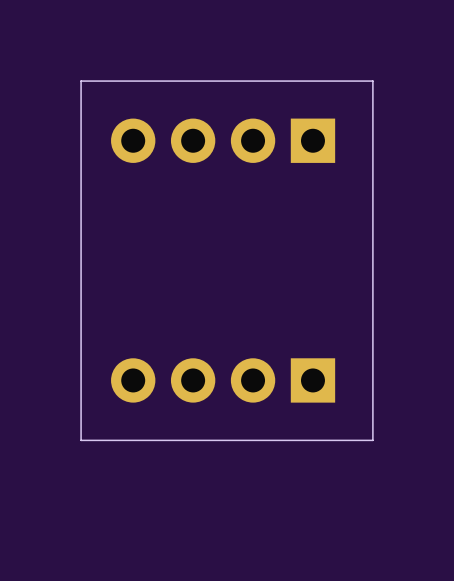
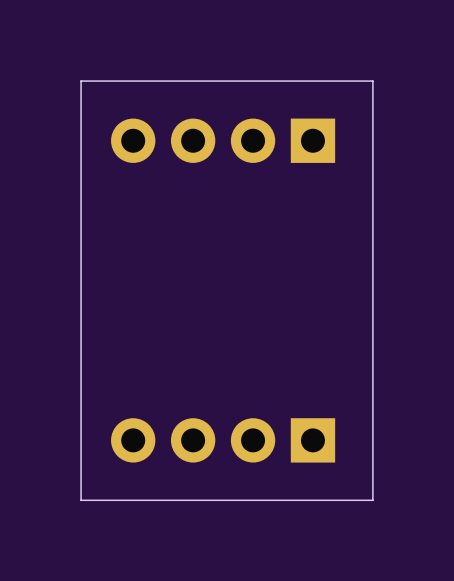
part position: (223, 380) -> (223, 440)
board edge: (372, 440) (81, 440) -> (372, 440) (372, 500) (81, 500) (81, 440)

